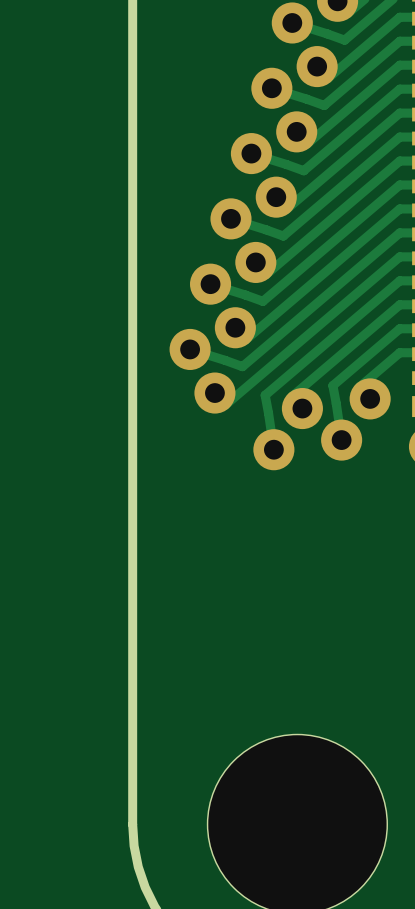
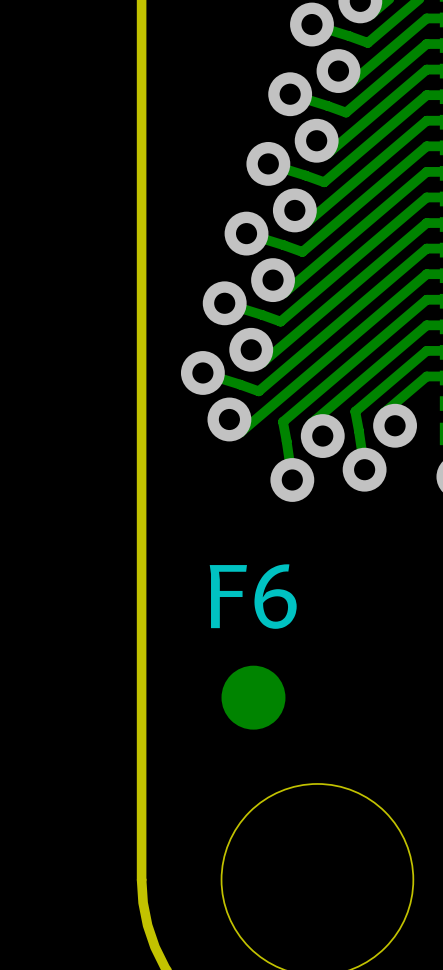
F6: none -> (253, 697)

